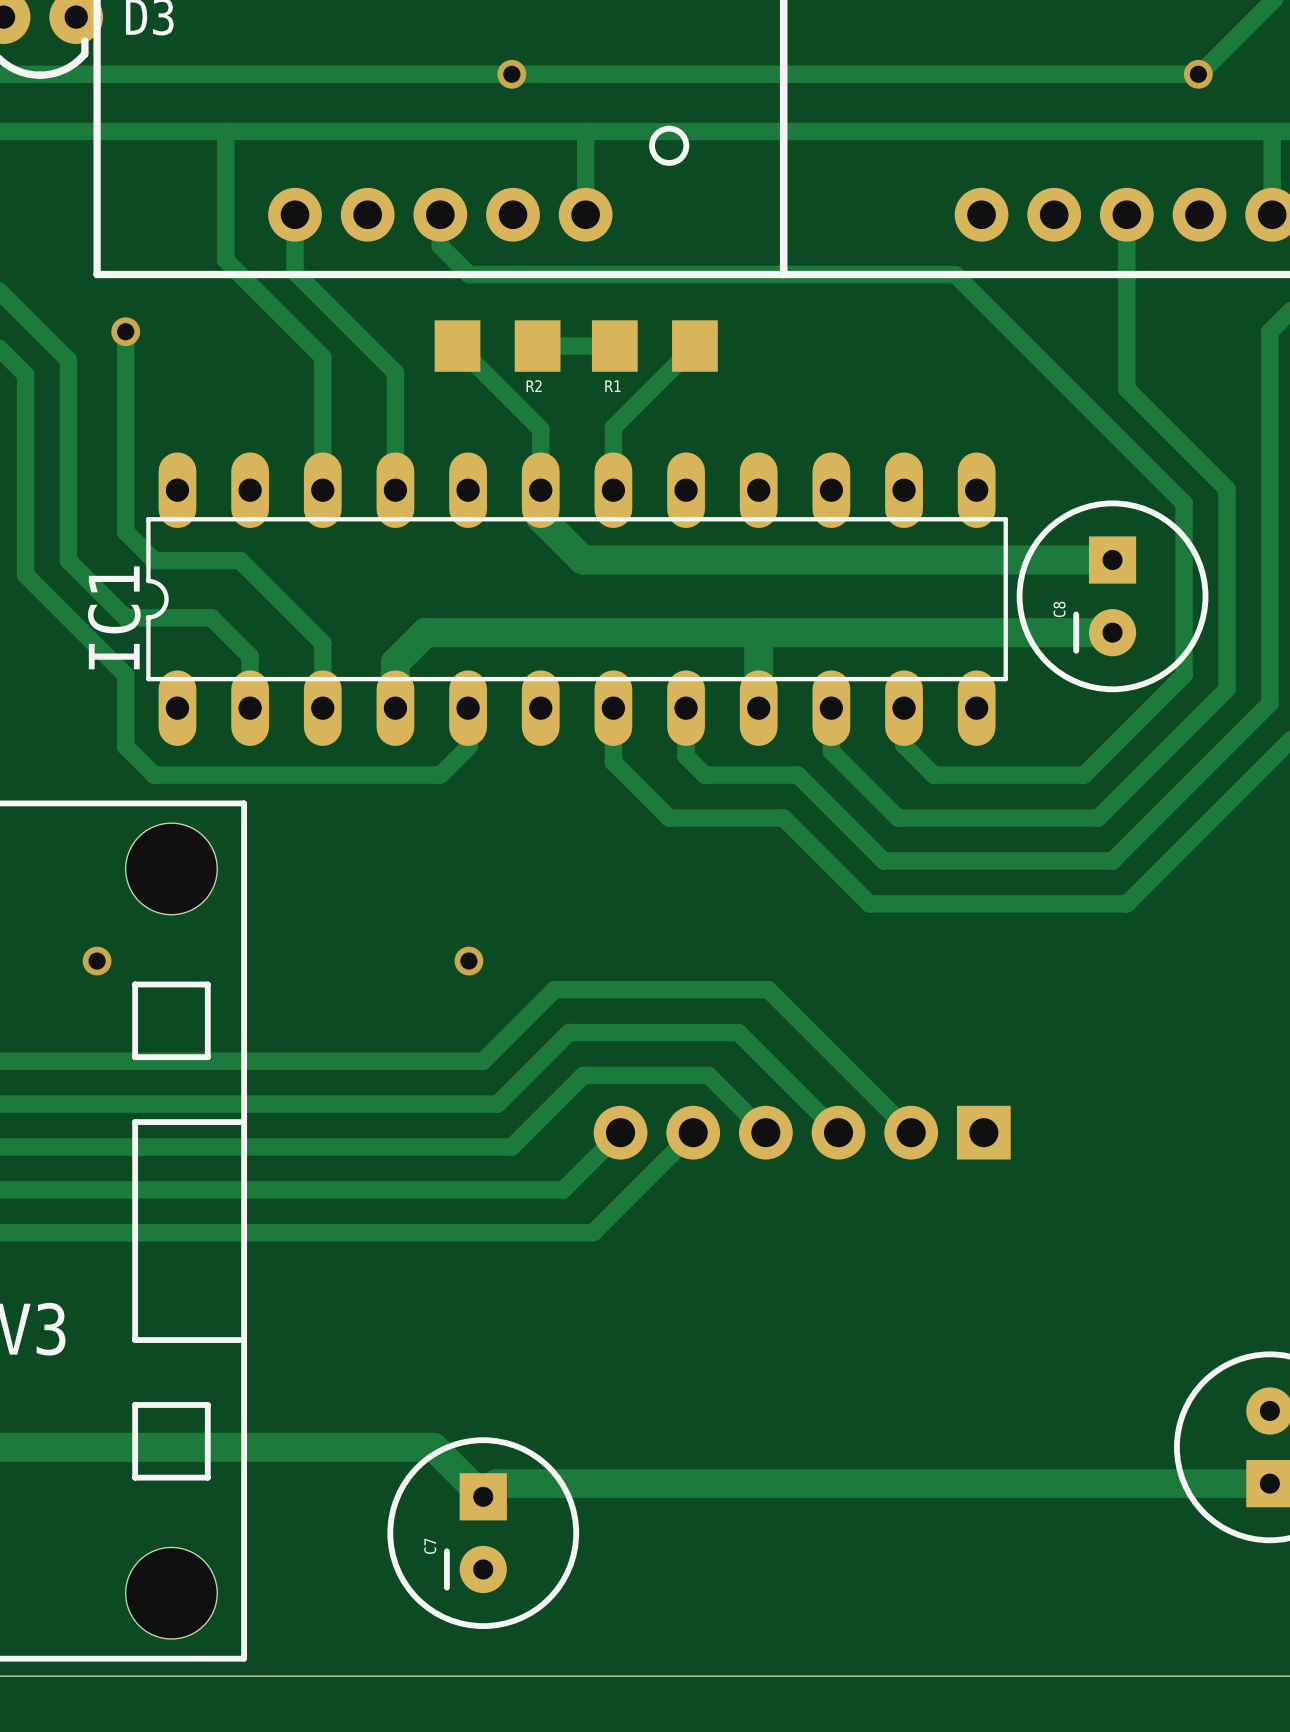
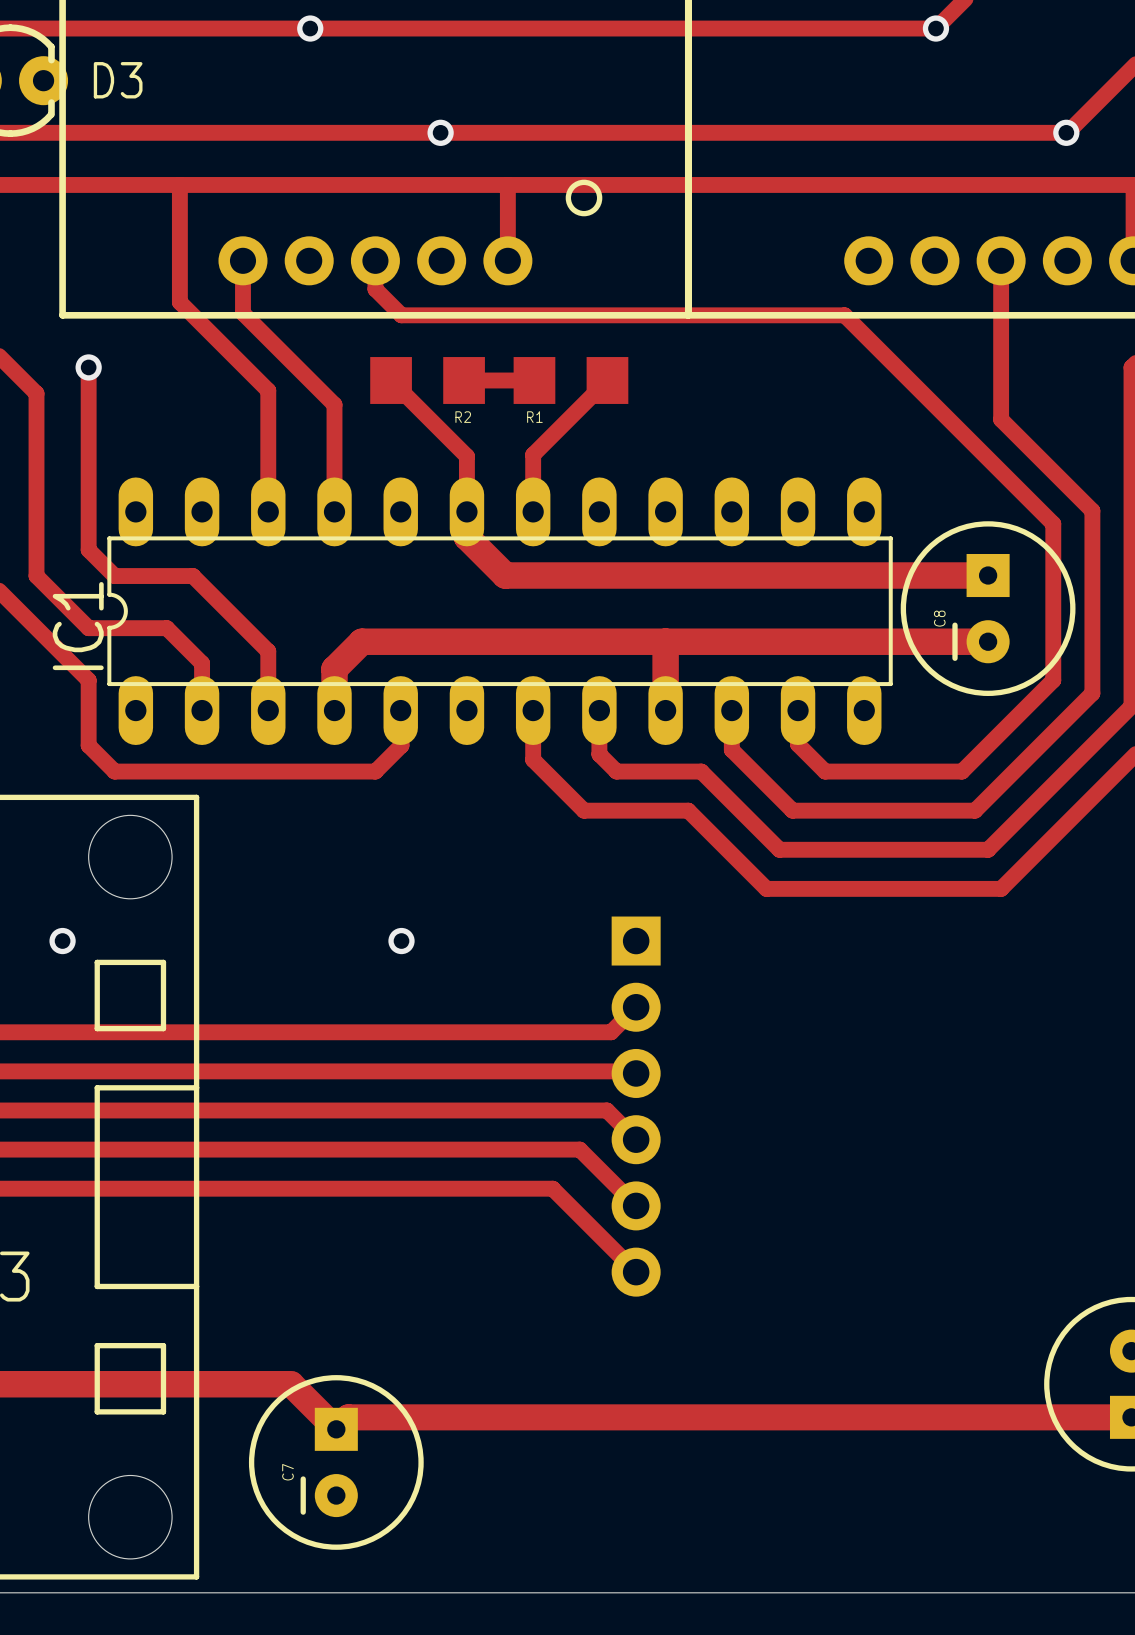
track: (483, 1061) (554, 989) (768, 989) (911, 1132) -> (414, 1032) (611, 1032) (636, 1007)
track: (497, 1104) (569, 1032) (738, 1032) (838, 1132) -> (427, 1071) (634, 1071) (636, 1073)
track: (620, 1132) (563, 1189) -> (636, 1205) (579, 1149) (487, 1149)
track: (693, 1132) (593, 1232) -> (636, 1272) (552, 1188) (514, 1188)
track: (765, 1132) (708, 1075) (583, 1075) (511, 1146) -> (636, 1139) (606, 1110) (440, 1110)
part rotation: 0° (802, 1132) -> 90° counterclockwise (636, 1106)
track: (347, 1447) (433, 1447) (483, 1496) (496, 1483) -> (291, 1384) (336, 1429) (348, 1417) (426, 1417)
C7 position: (483, 1533) -> (336, 1462)

